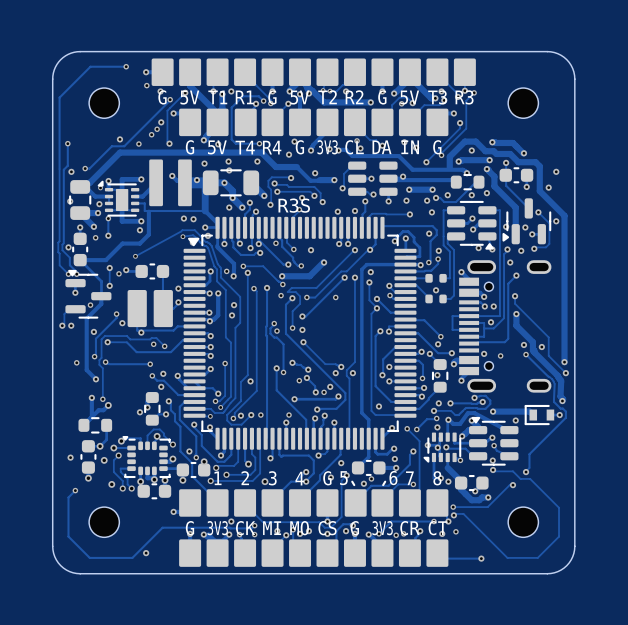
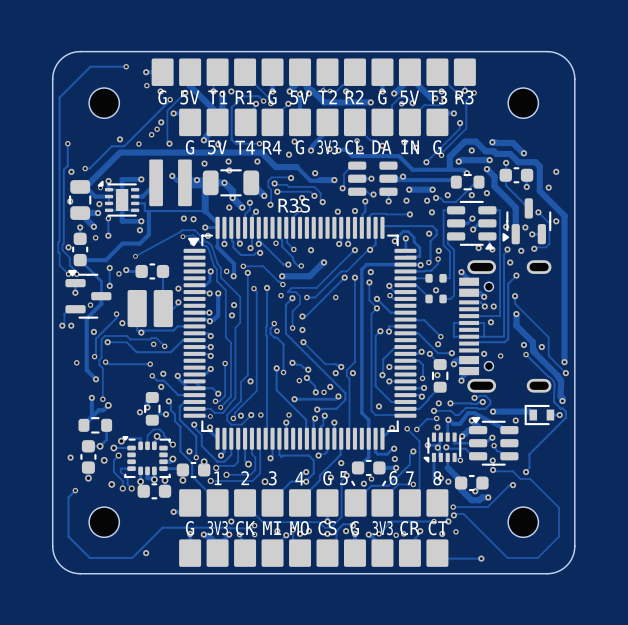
track: (469, 316) (452, 316) (452, 329) (469, 329) -> none
track: (504, 318) (493, 328) (484, 328) -> (504, 318) (504, 336) (484, 336)
track: none -> (469, 322) (453, 322) (453, 336) (469, 336)

